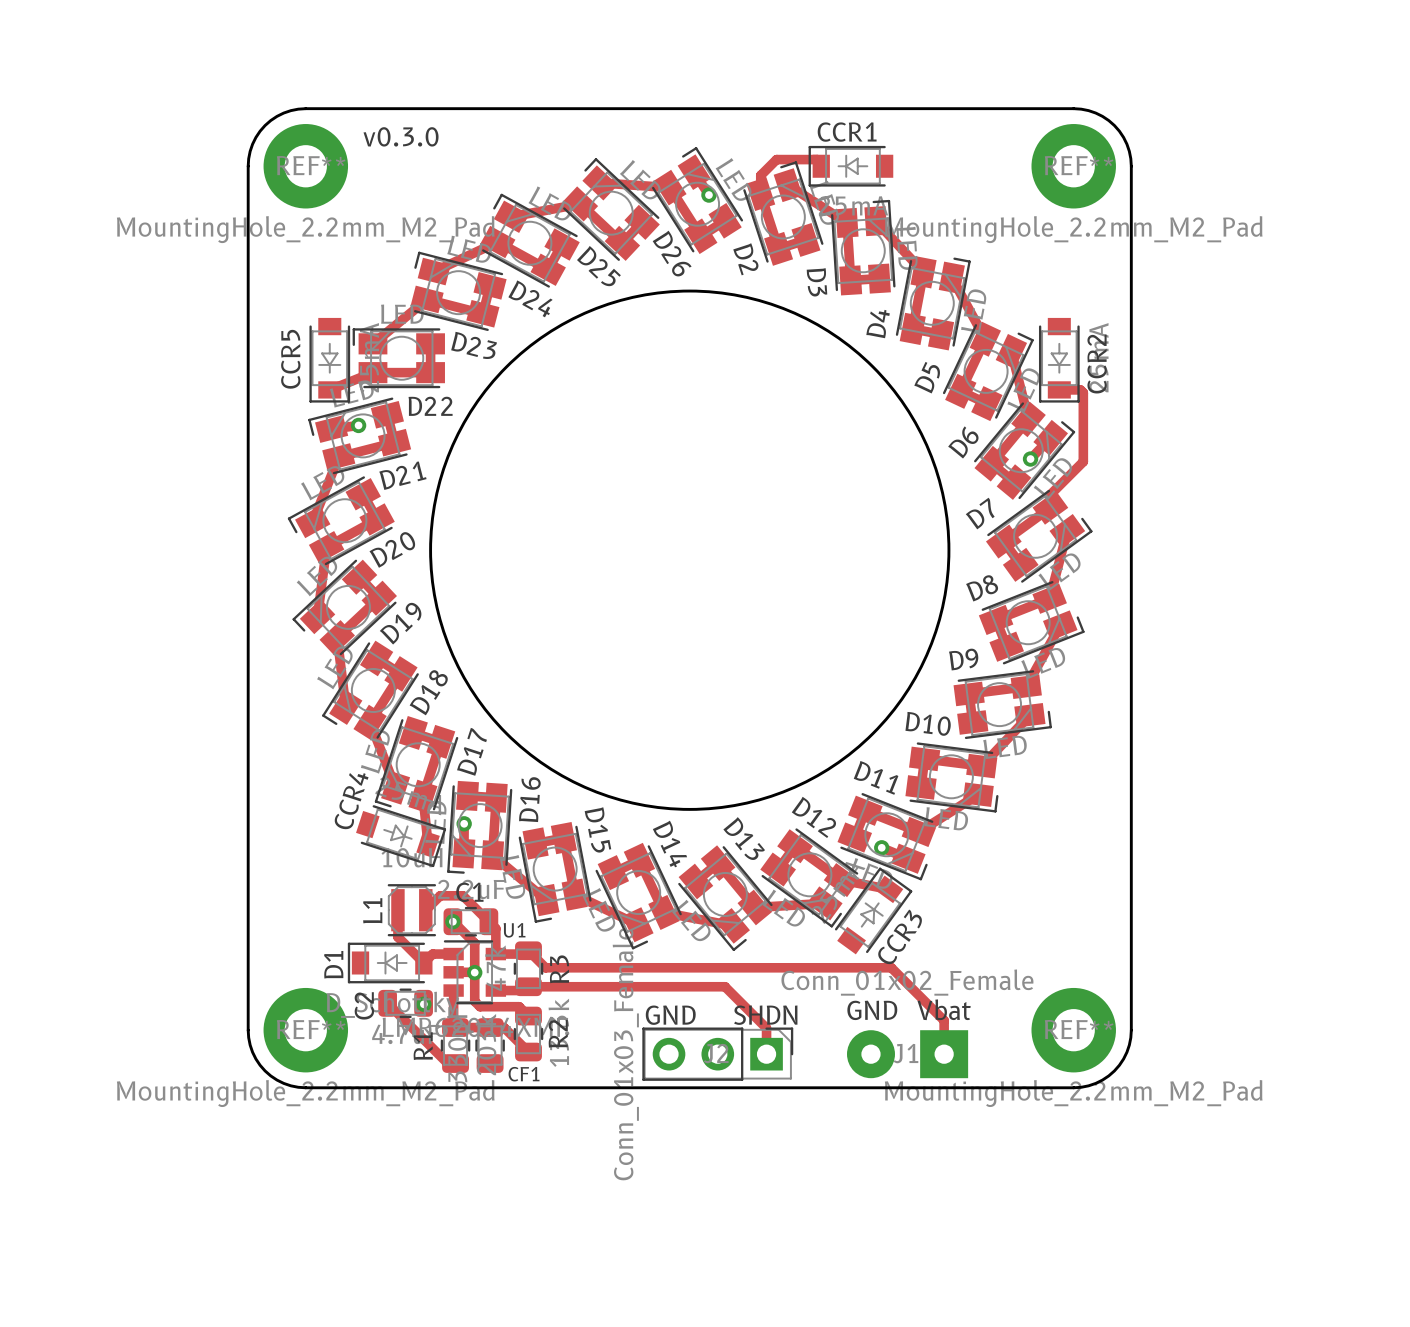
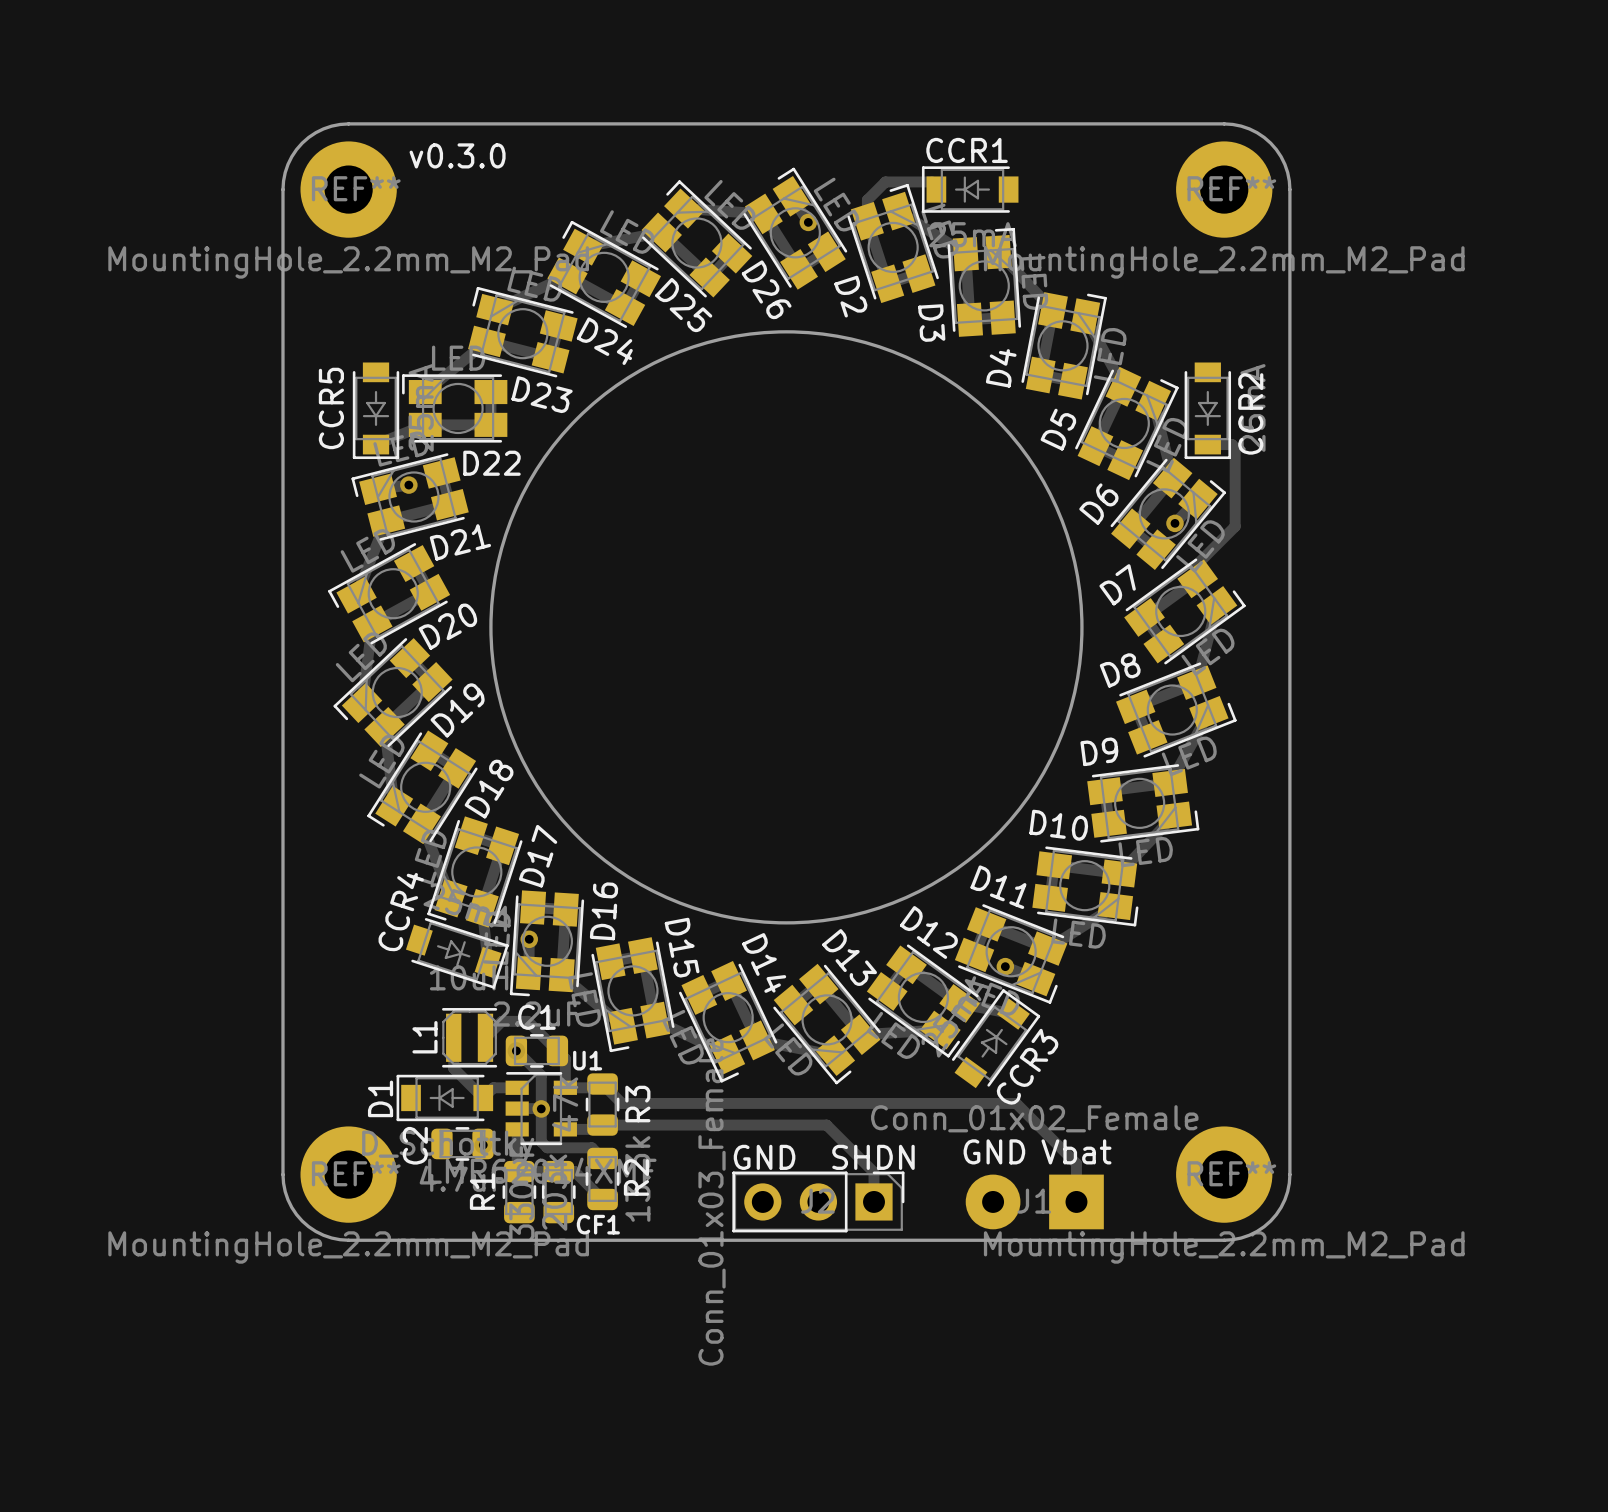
track: (387, 1003) (447, 1063) -> none

